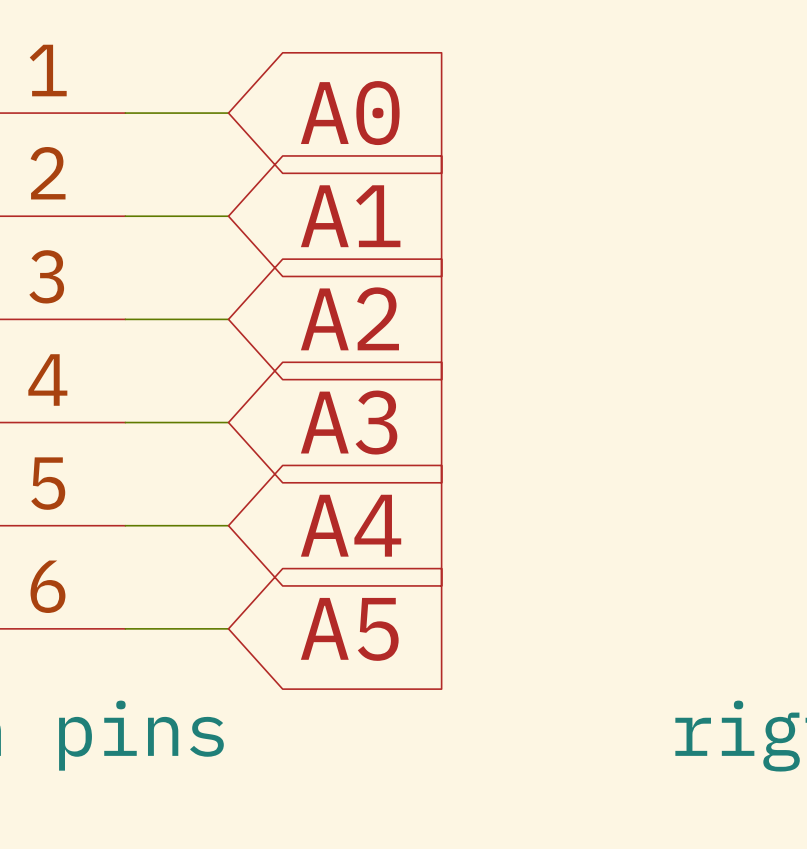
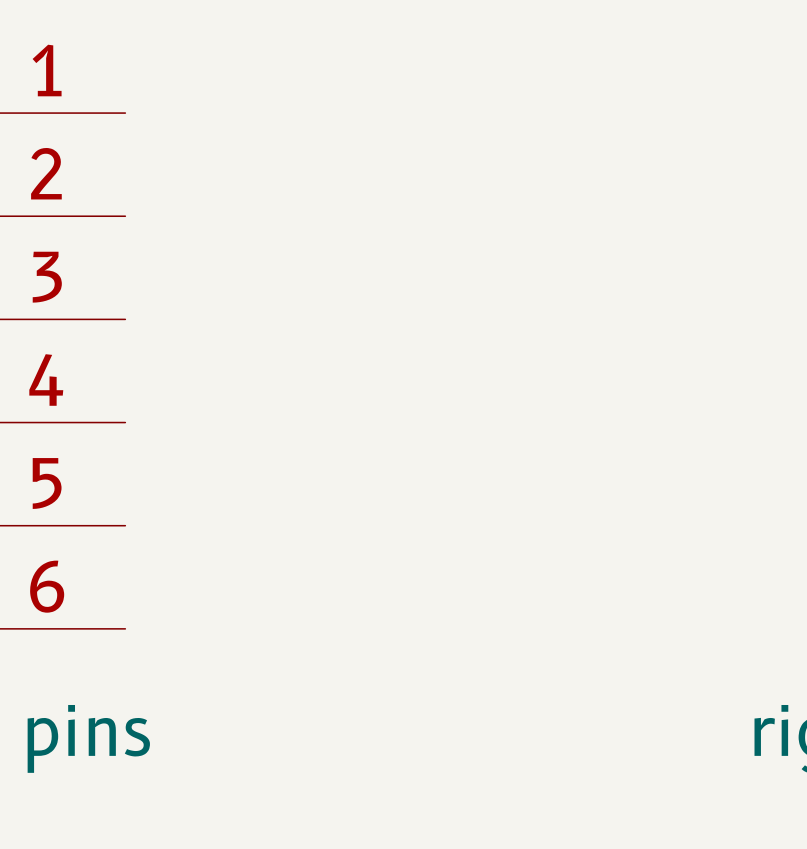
wire: (125, 113) (228, 113) -> none
global label: A0 (350, 113) -> none
wire: (125, 216) (228, 216) -> none
global label: A1 (350, 216) -> none
global label: A2 (349, 318) -> none
wire: (125, 319) (228, 319) -> none
wire: (125, 422) (228, 422) -> none
global label: A3 (349, 422) -> none
wire: (125, 525) (228, 525) -> none
global label: A4 (351, 525) -> none
wire: (125, 628) (228, 628) -> none
global label: A5 (349, 629) -> none

